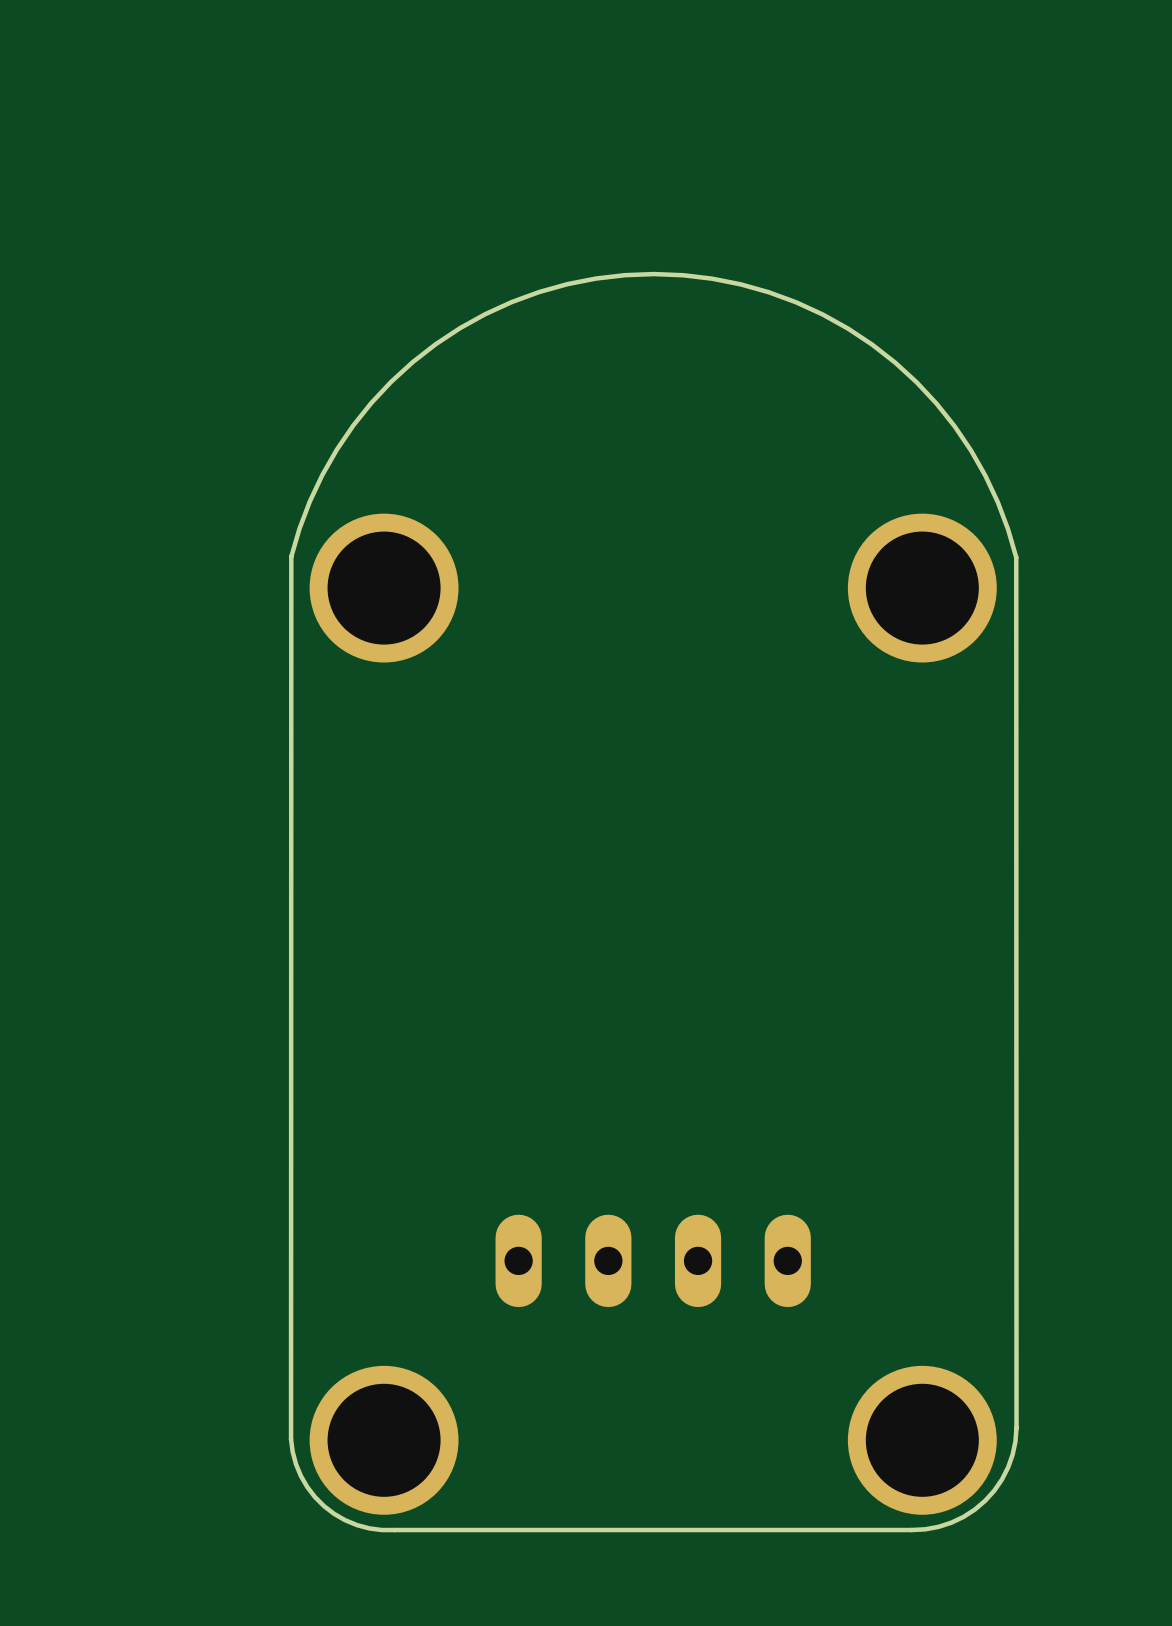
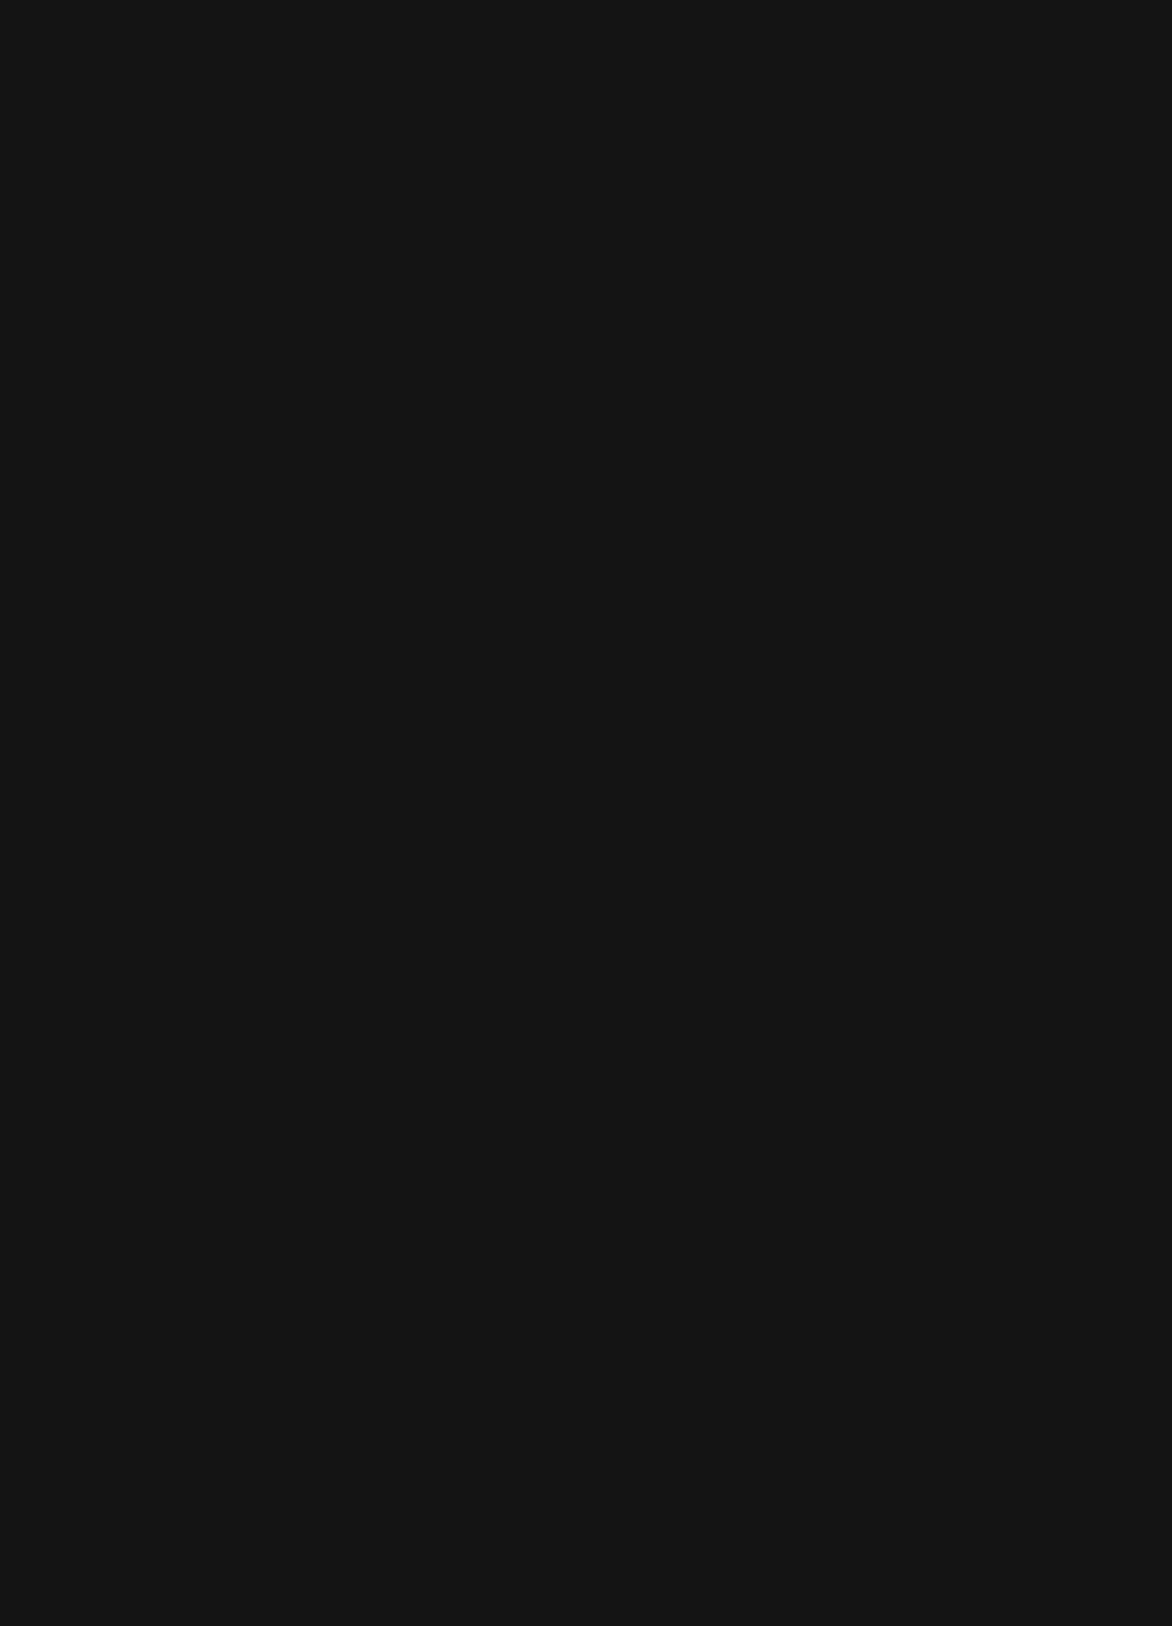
part: (653, 902) -> none

